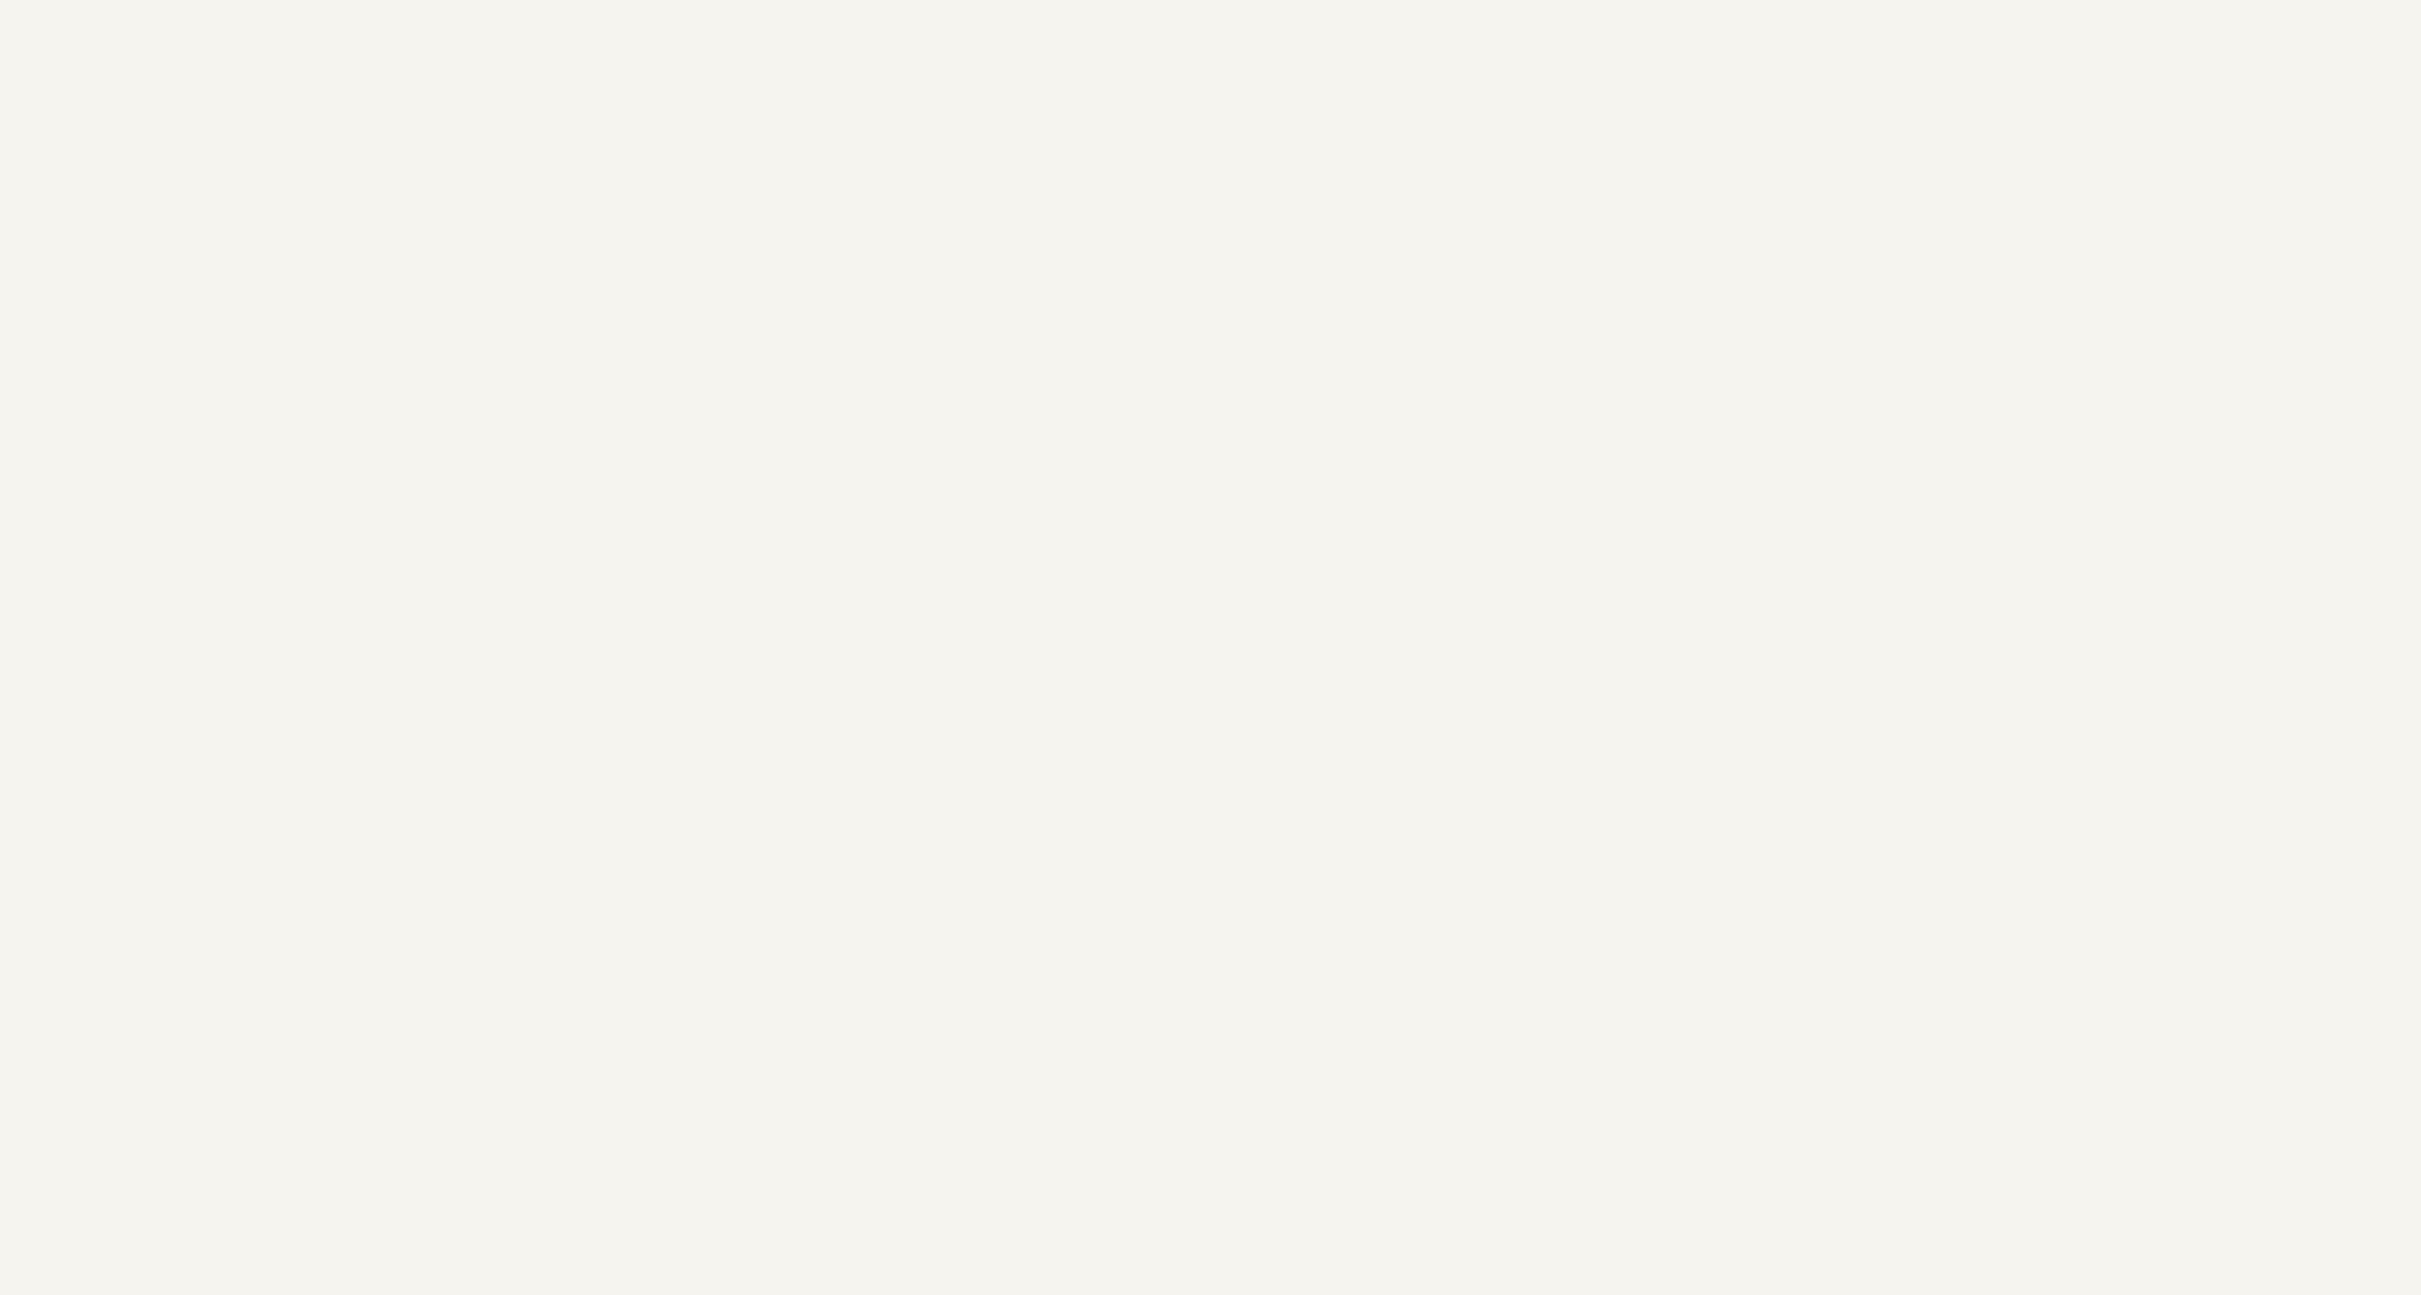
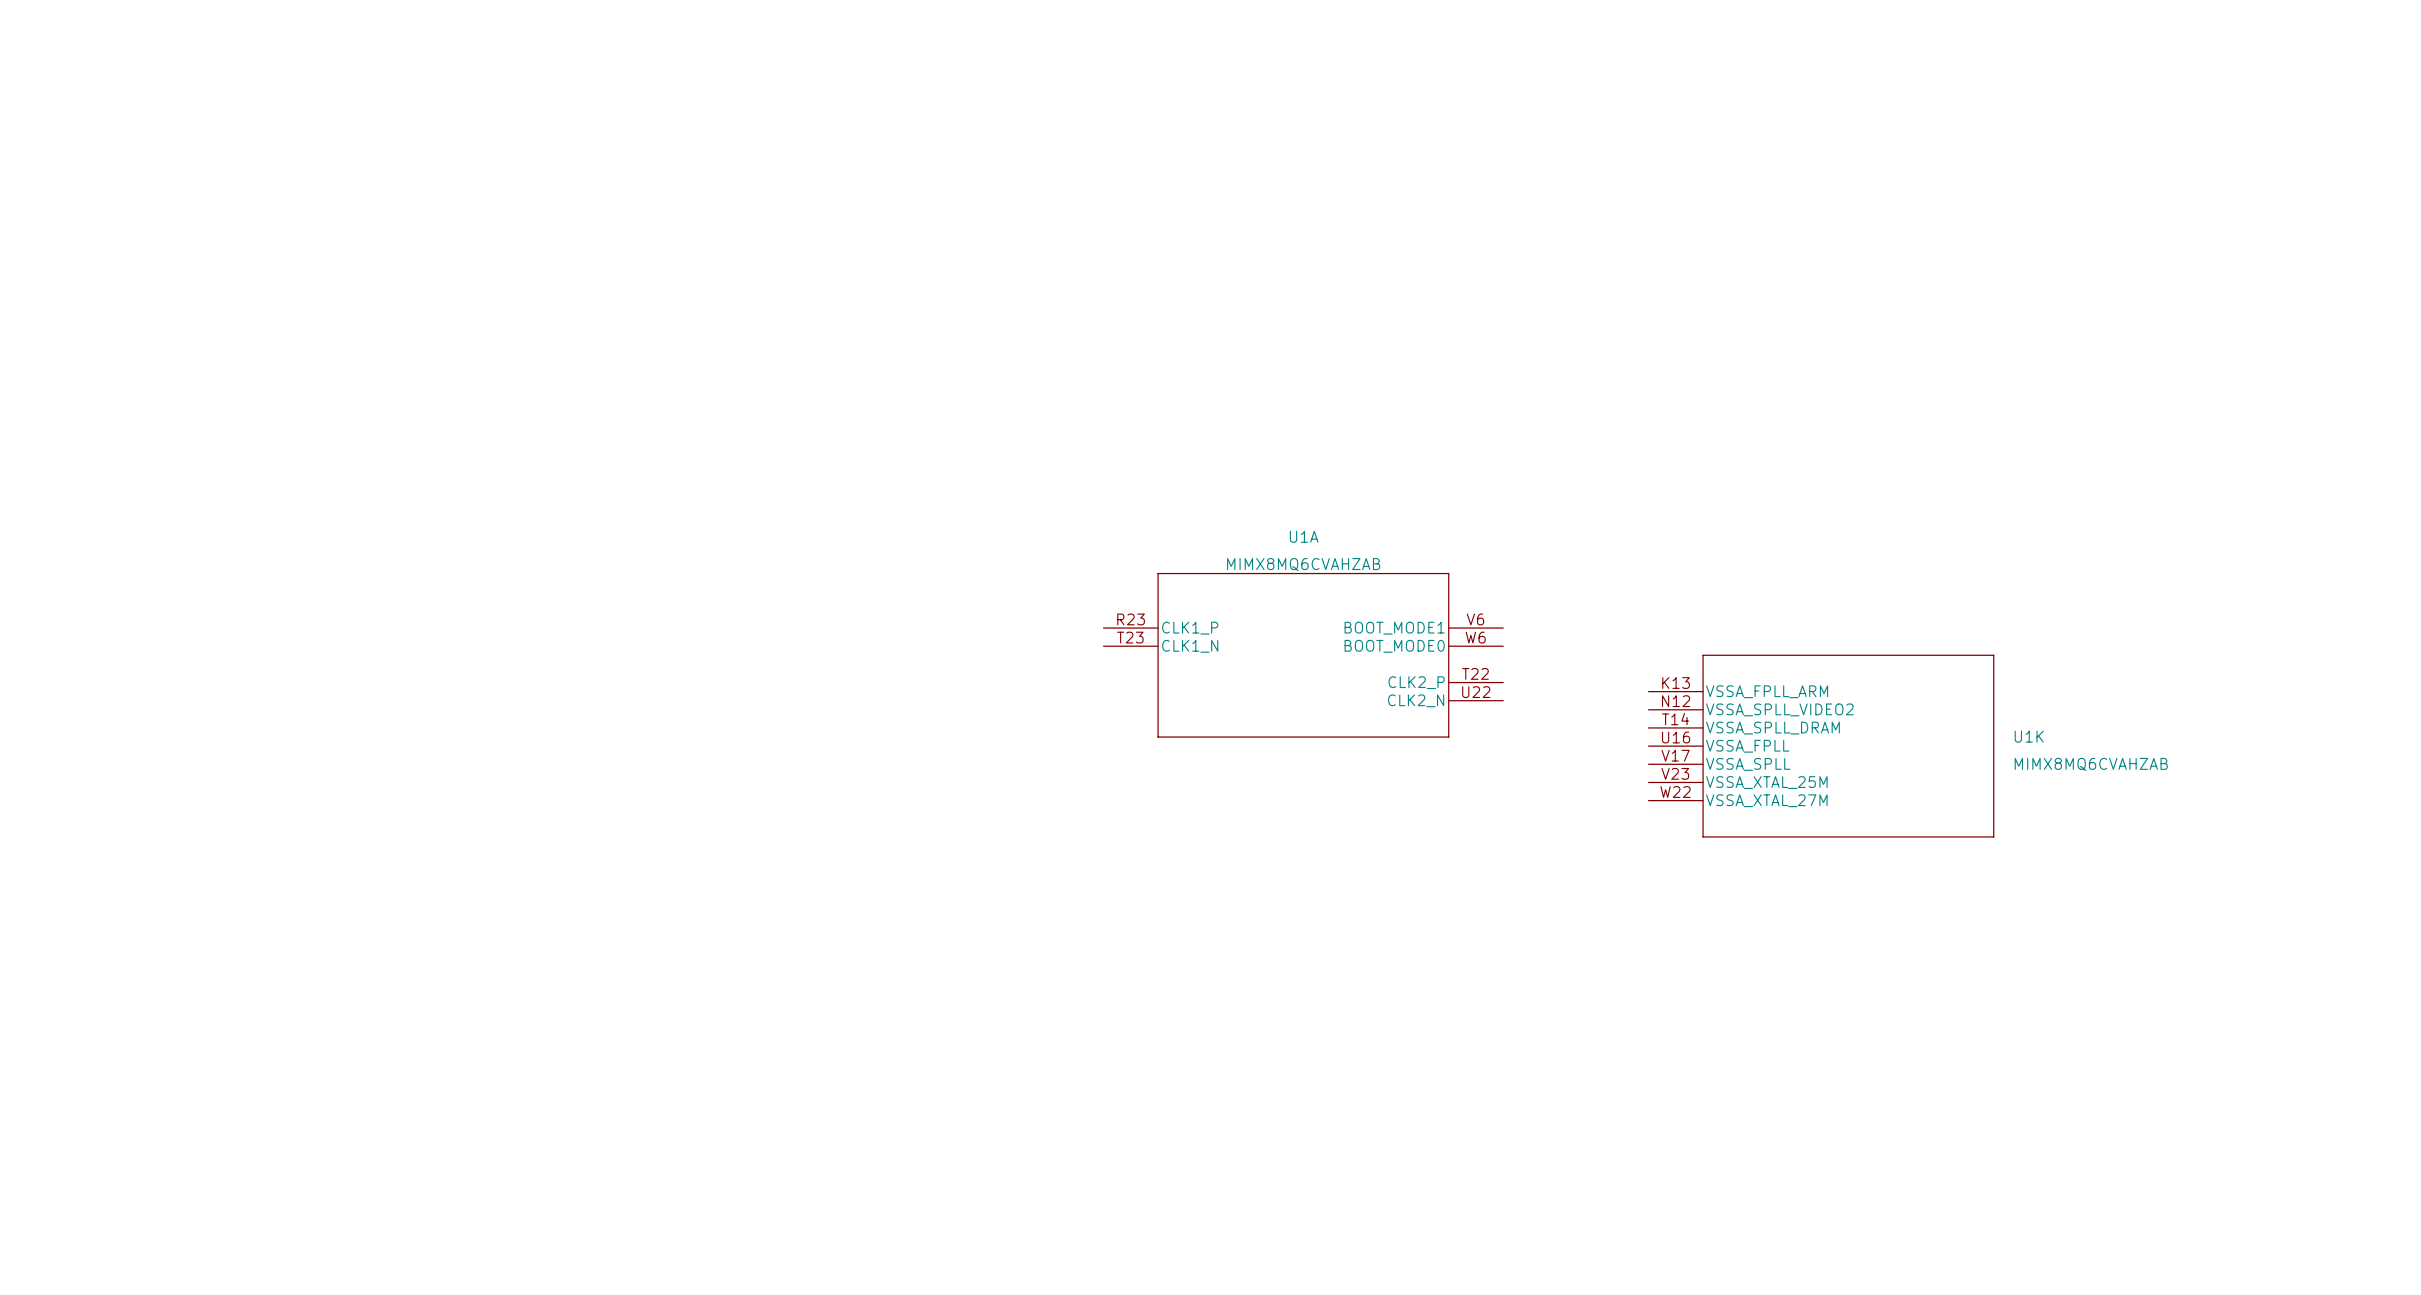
U1A: none -> MIMX8MQ6CVAHZAB (1303, 655)
U1K: none -> MIMX8MQ6CVAHZAB (1821, 746)

